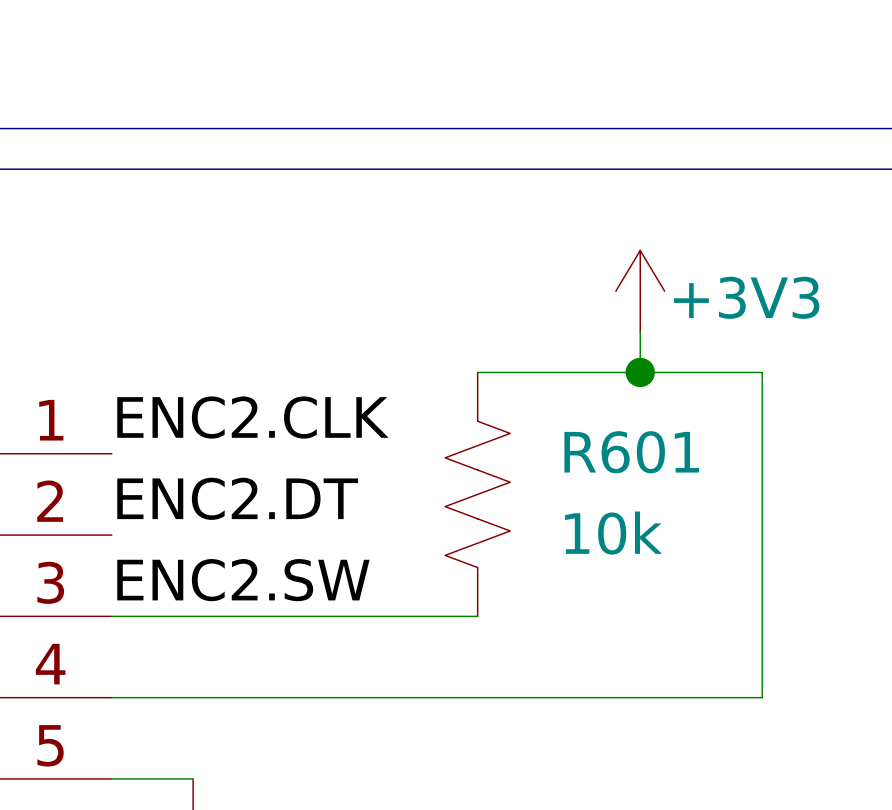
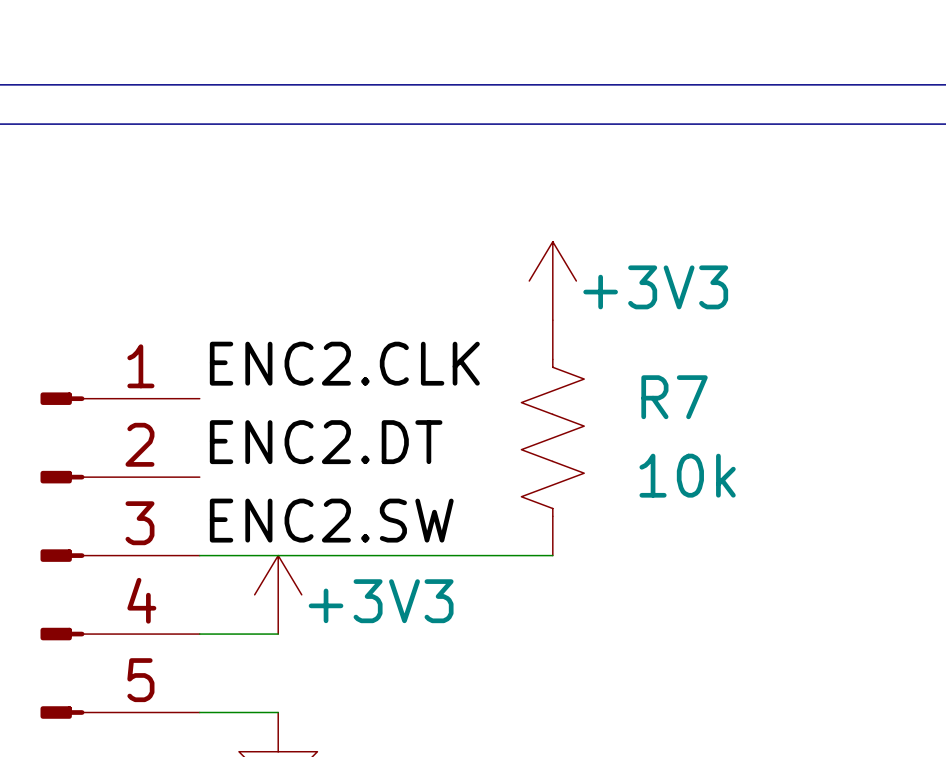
power symbol position: +3V3 (640, 291) -> +3V3 (552, 281)
wire: (640, 331) (640, 372) -> none
wire: (477, 372) (762, 372) (762, 697) (193, 697) -> none
junction: (640, 372) -> none
R601 name: R601 (631, 452) -> R7 (674, 397)
power symbol: none -> +3V3 (278, 594)

